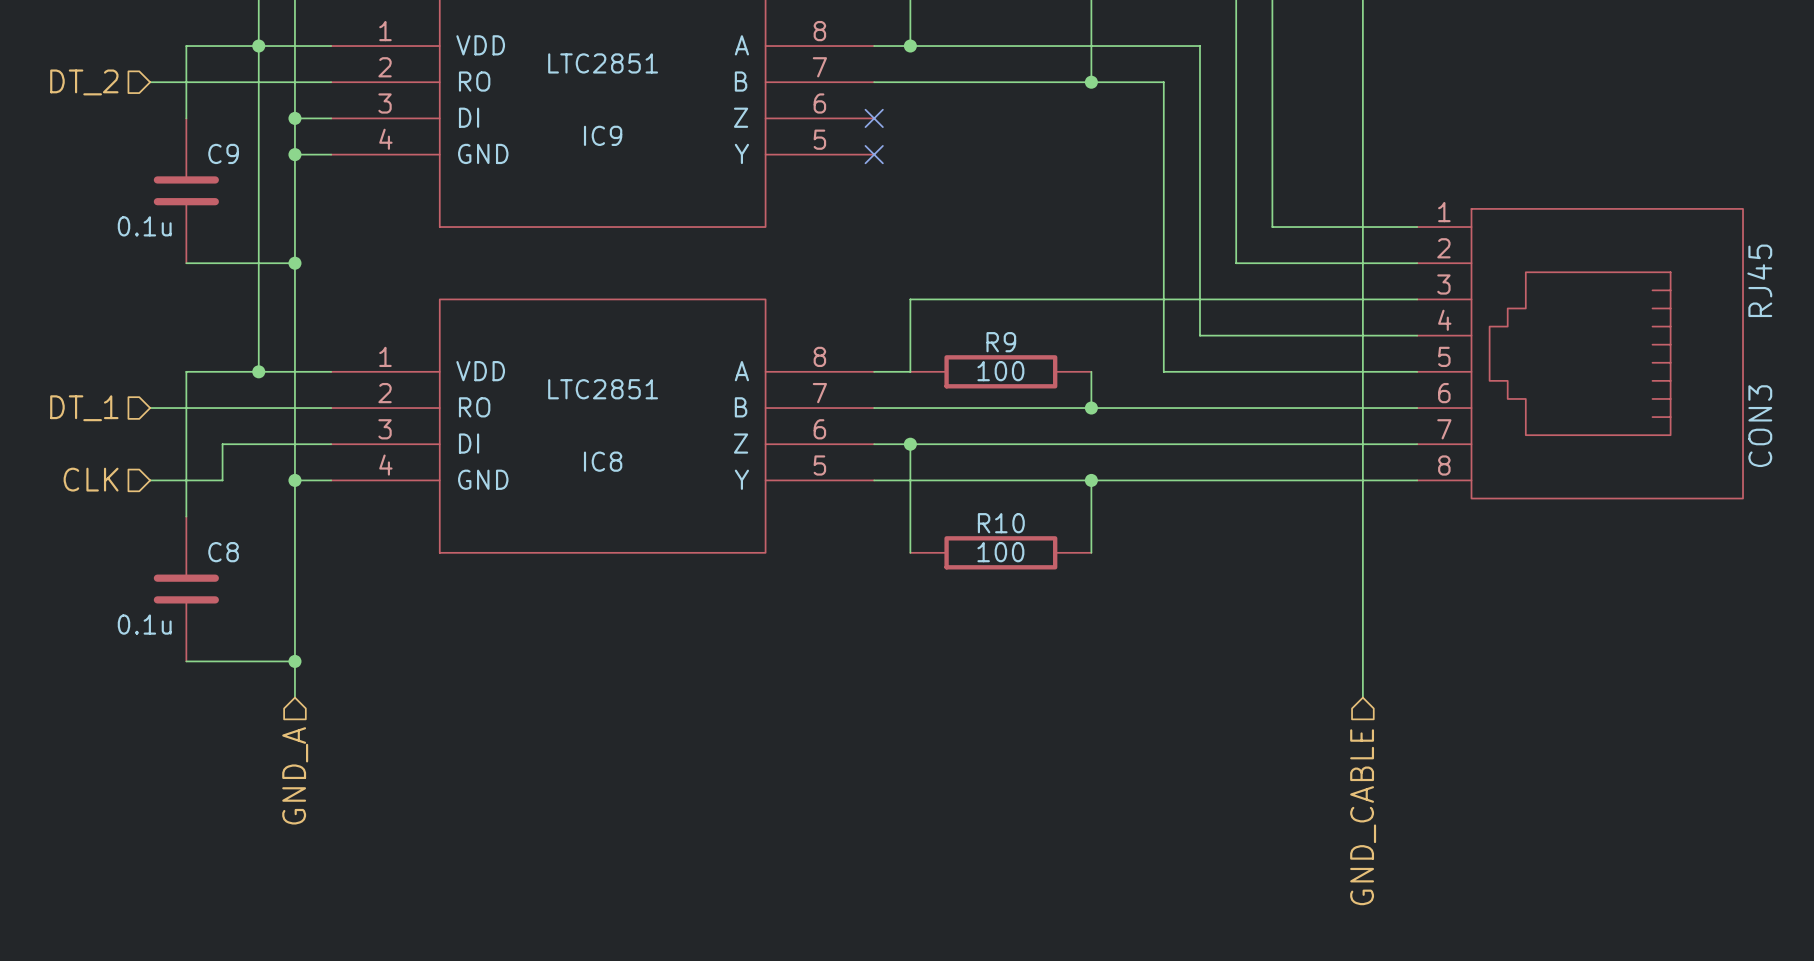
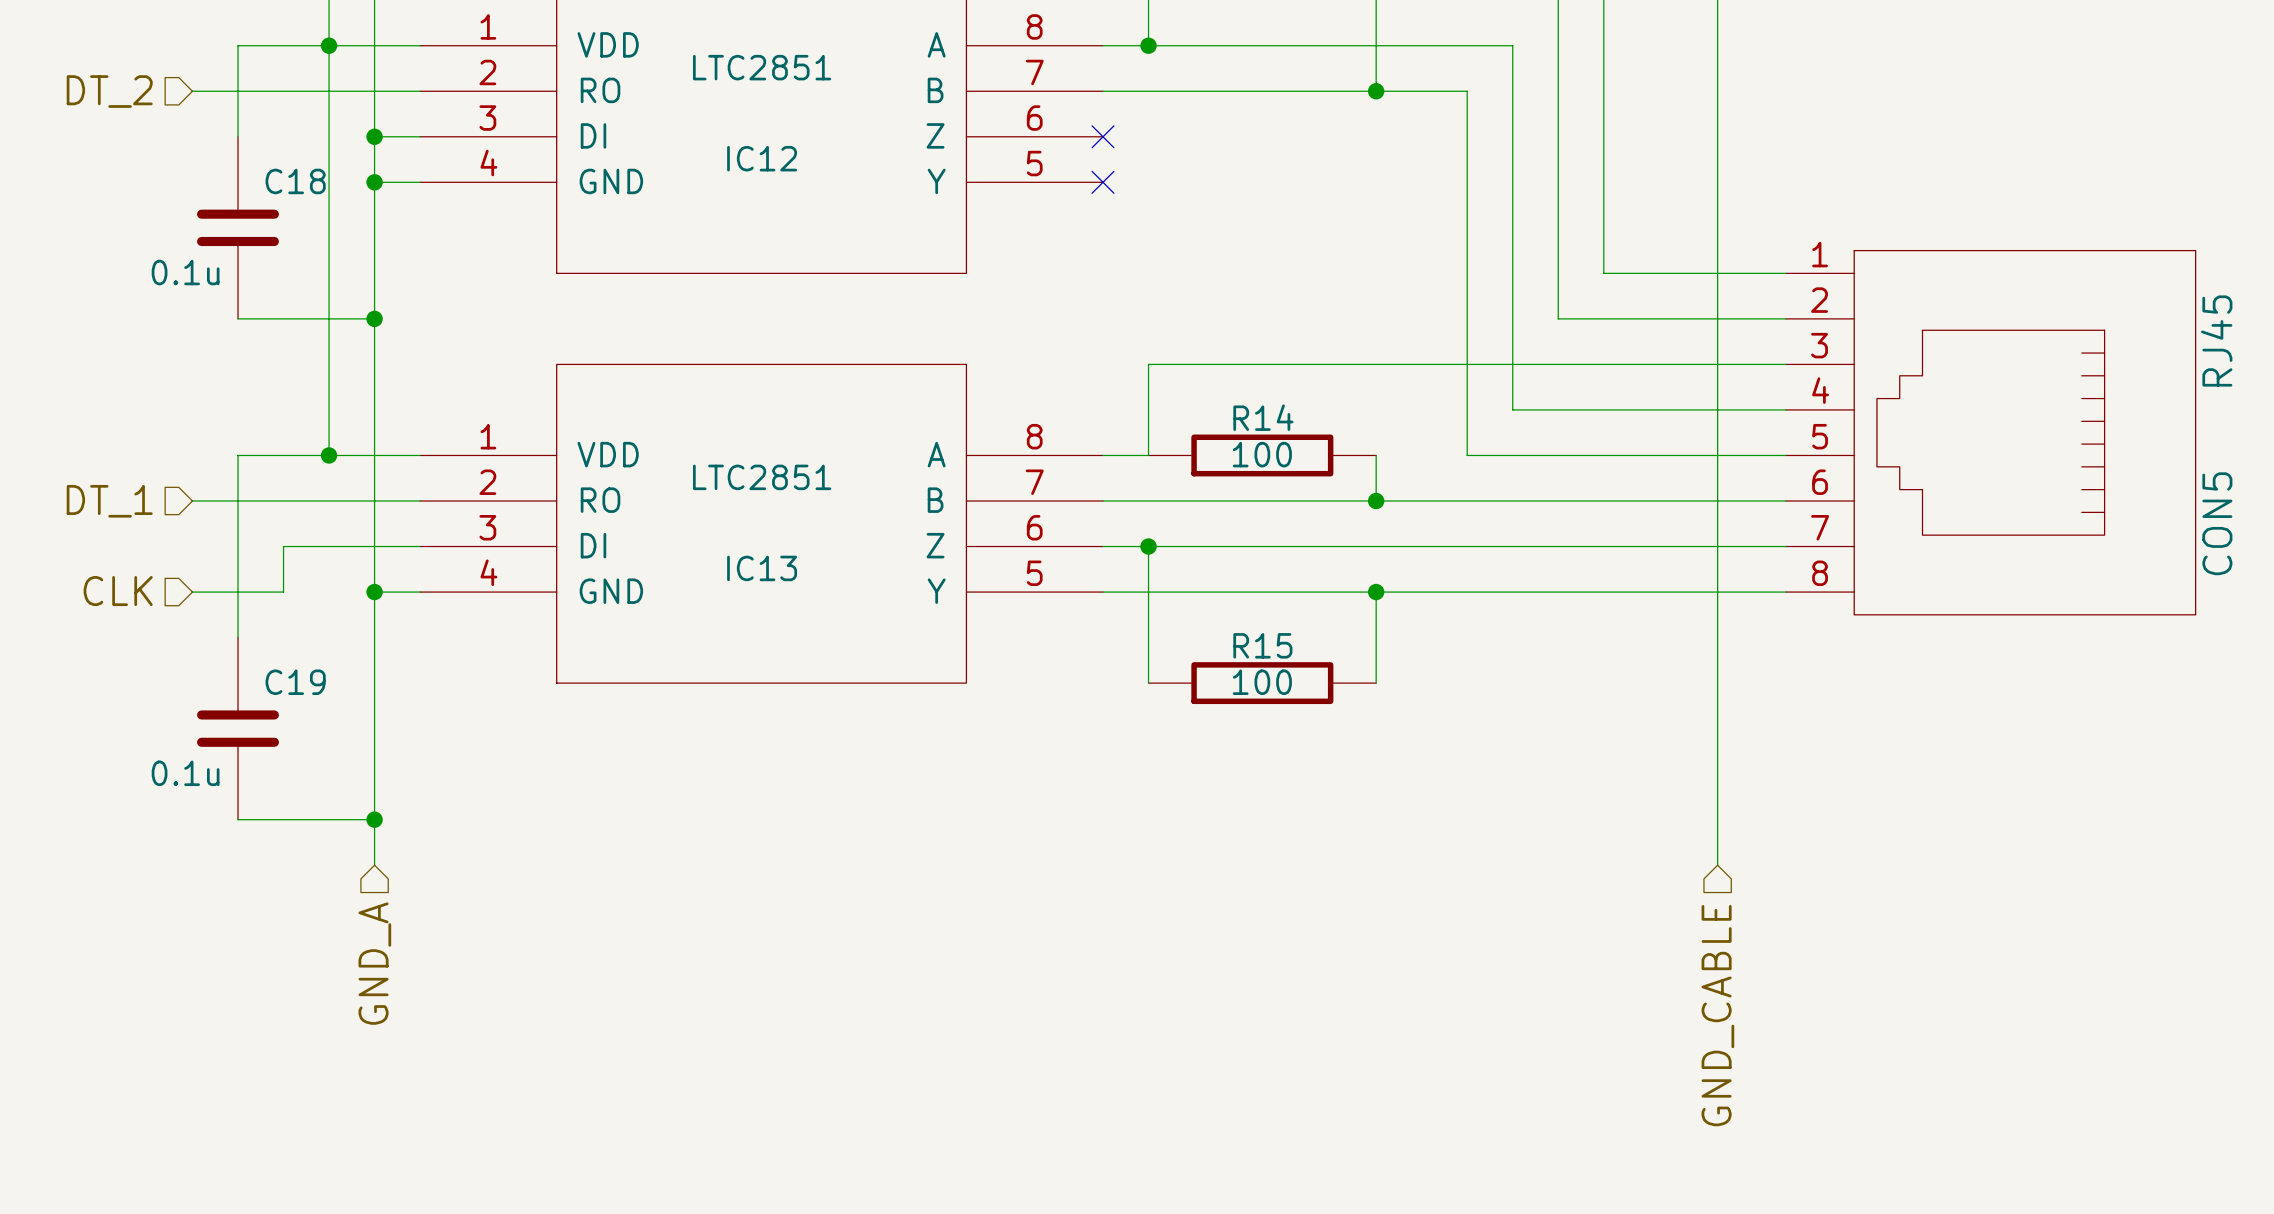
IC9 name: IC9 (603, 135) -> IC12 (762, 158)
C9 name: C9 (223, 153) -> C18 (295, 181)
R9 name: R9 (1001, 342) -> R14 (1263, 417)
CON3 name: CON3 (1760, 426) -> CON5 (2217, 523)
IC8 name: IC8 (603, 461) -> IC13 (762, 568)
R10 name: R10 (1001, 523) -> R15 (1262, 645)
C8 name: C8 (223, 552) -> C19 (295, 682)

